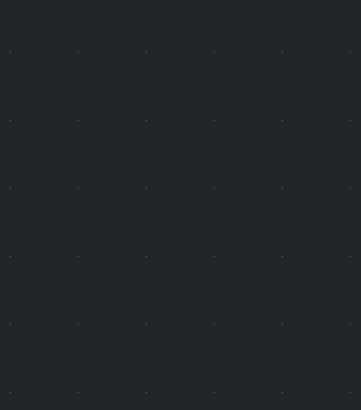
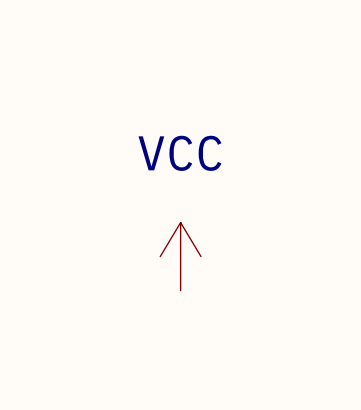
power symbol: none -> VCC (180, 256)

